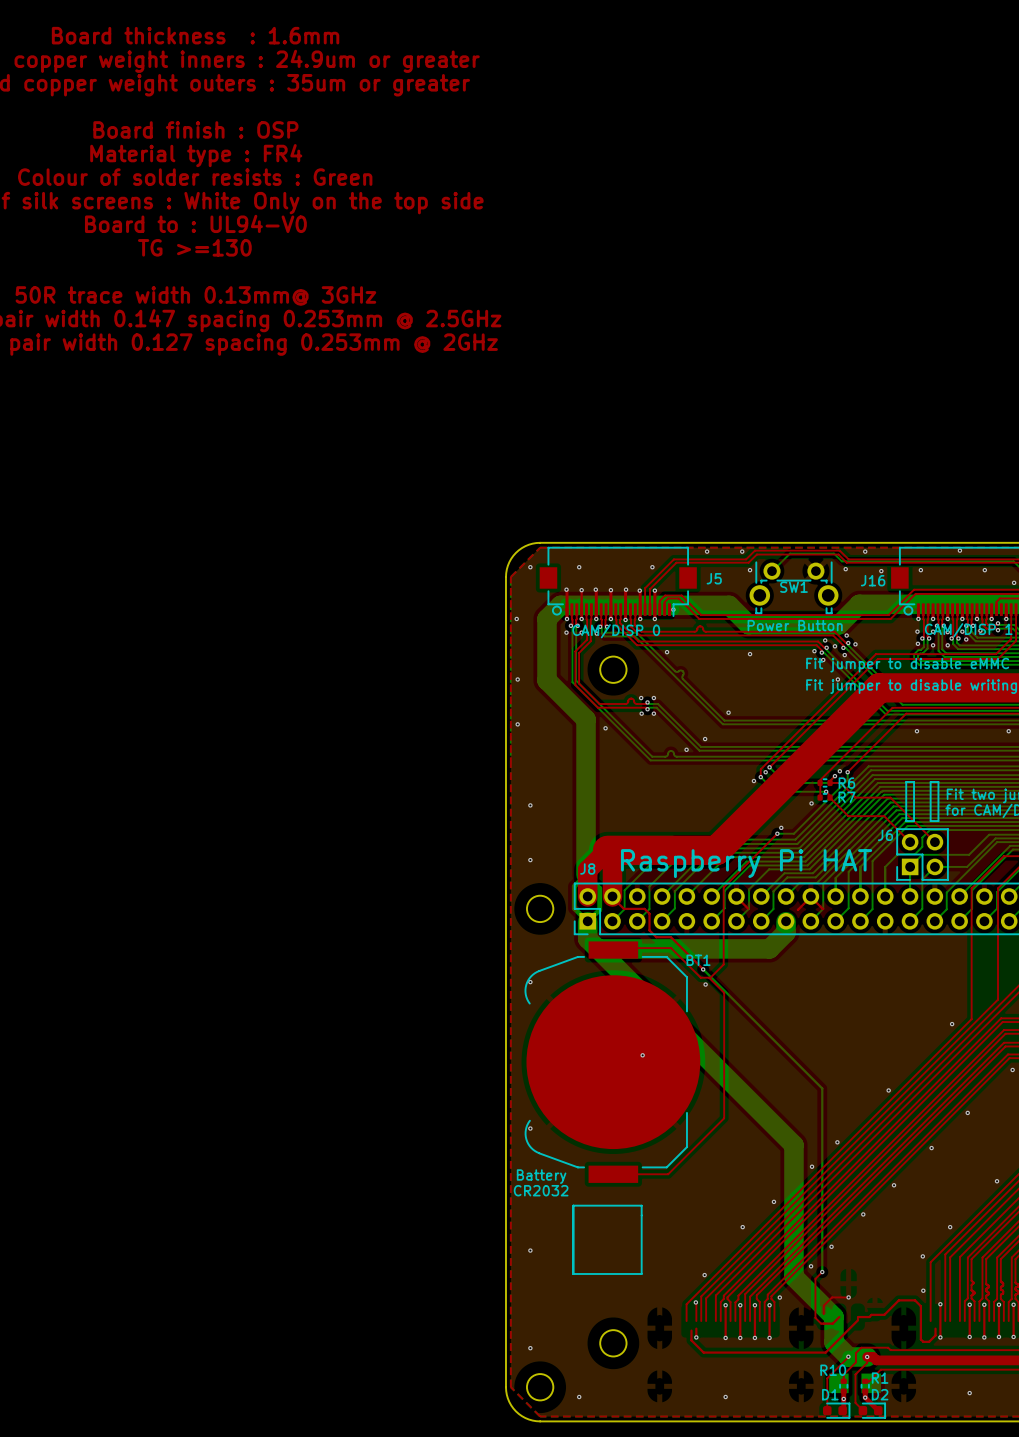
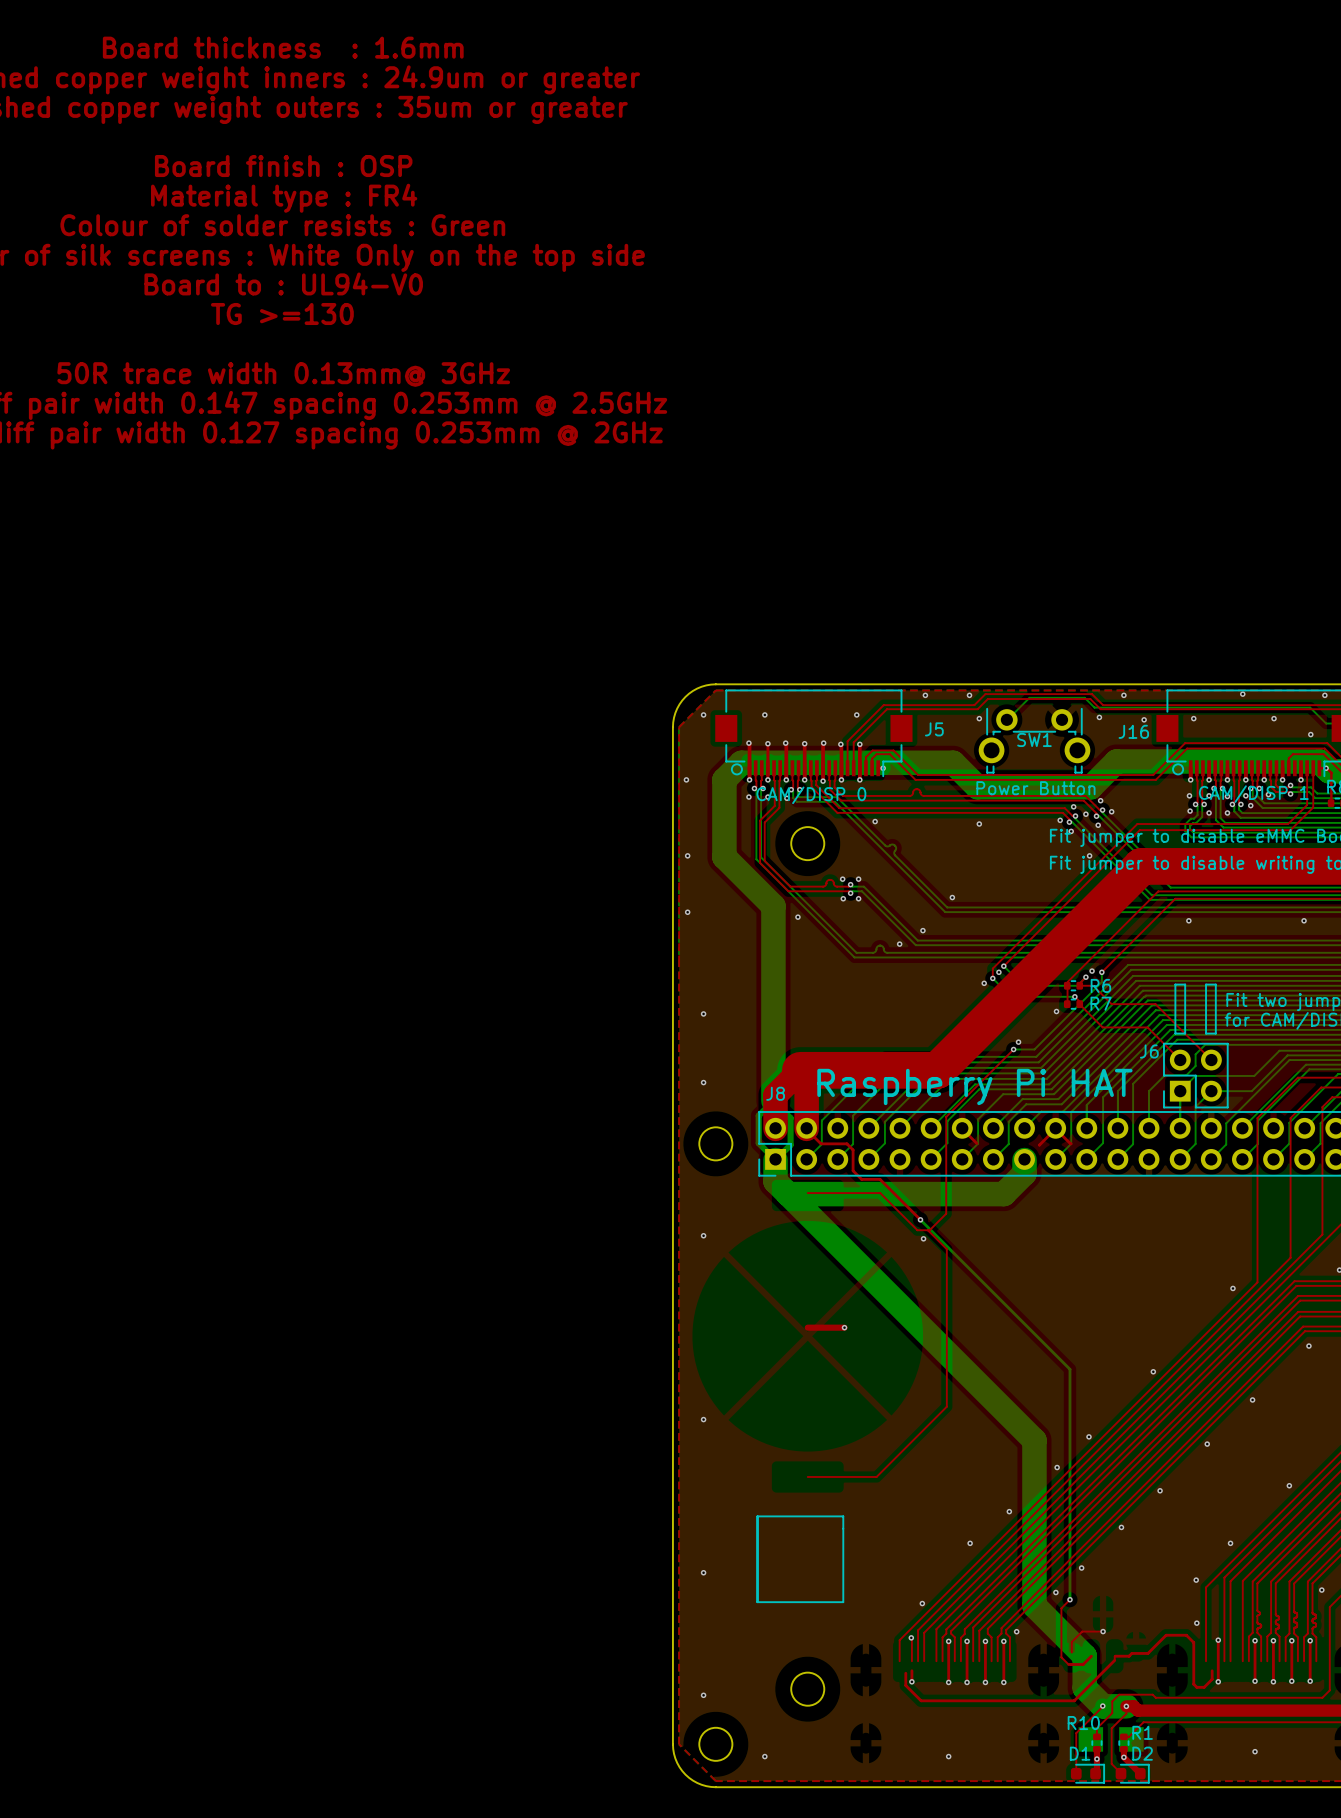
BT1: (612, 1062) -> none
text: Battery (541, 1176) -> none
text: CR2032 (541, 1190) -> none

